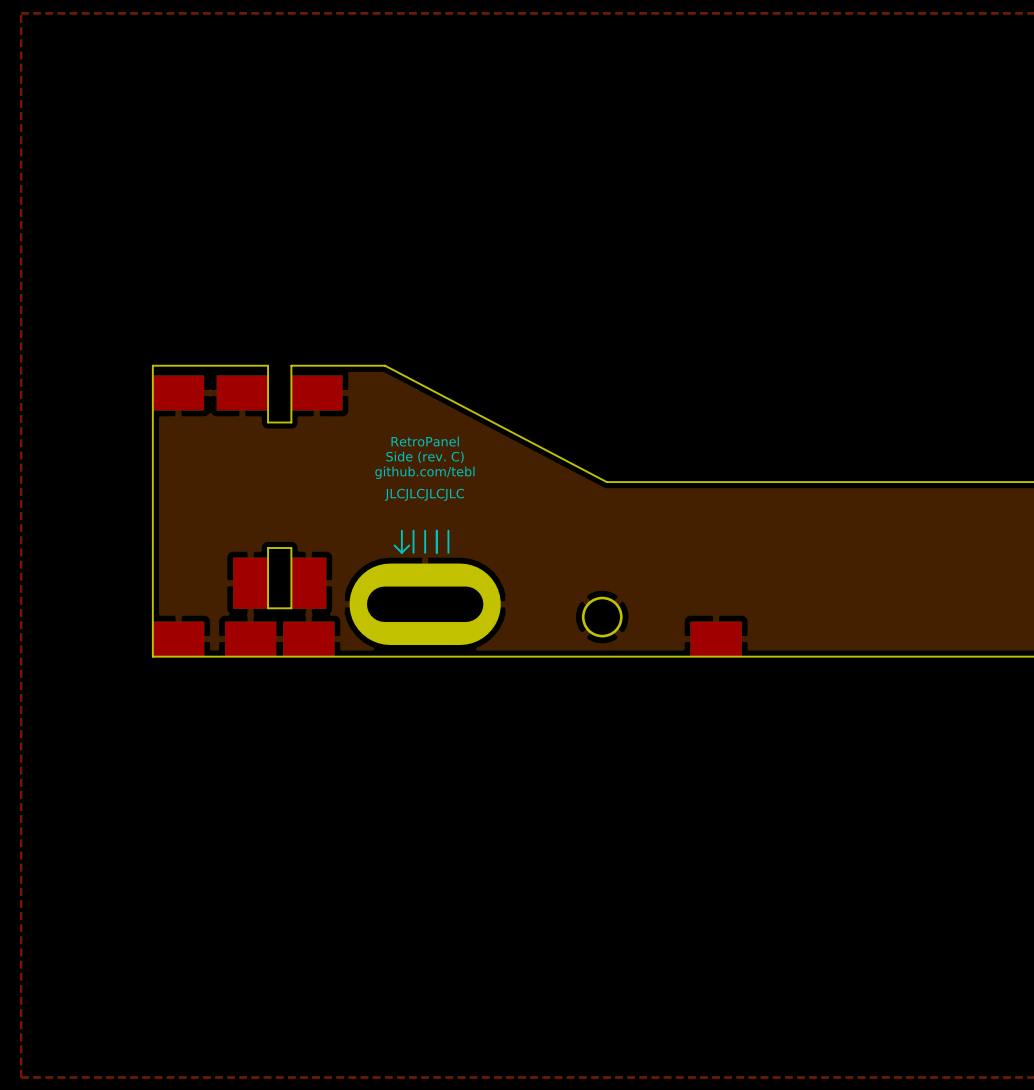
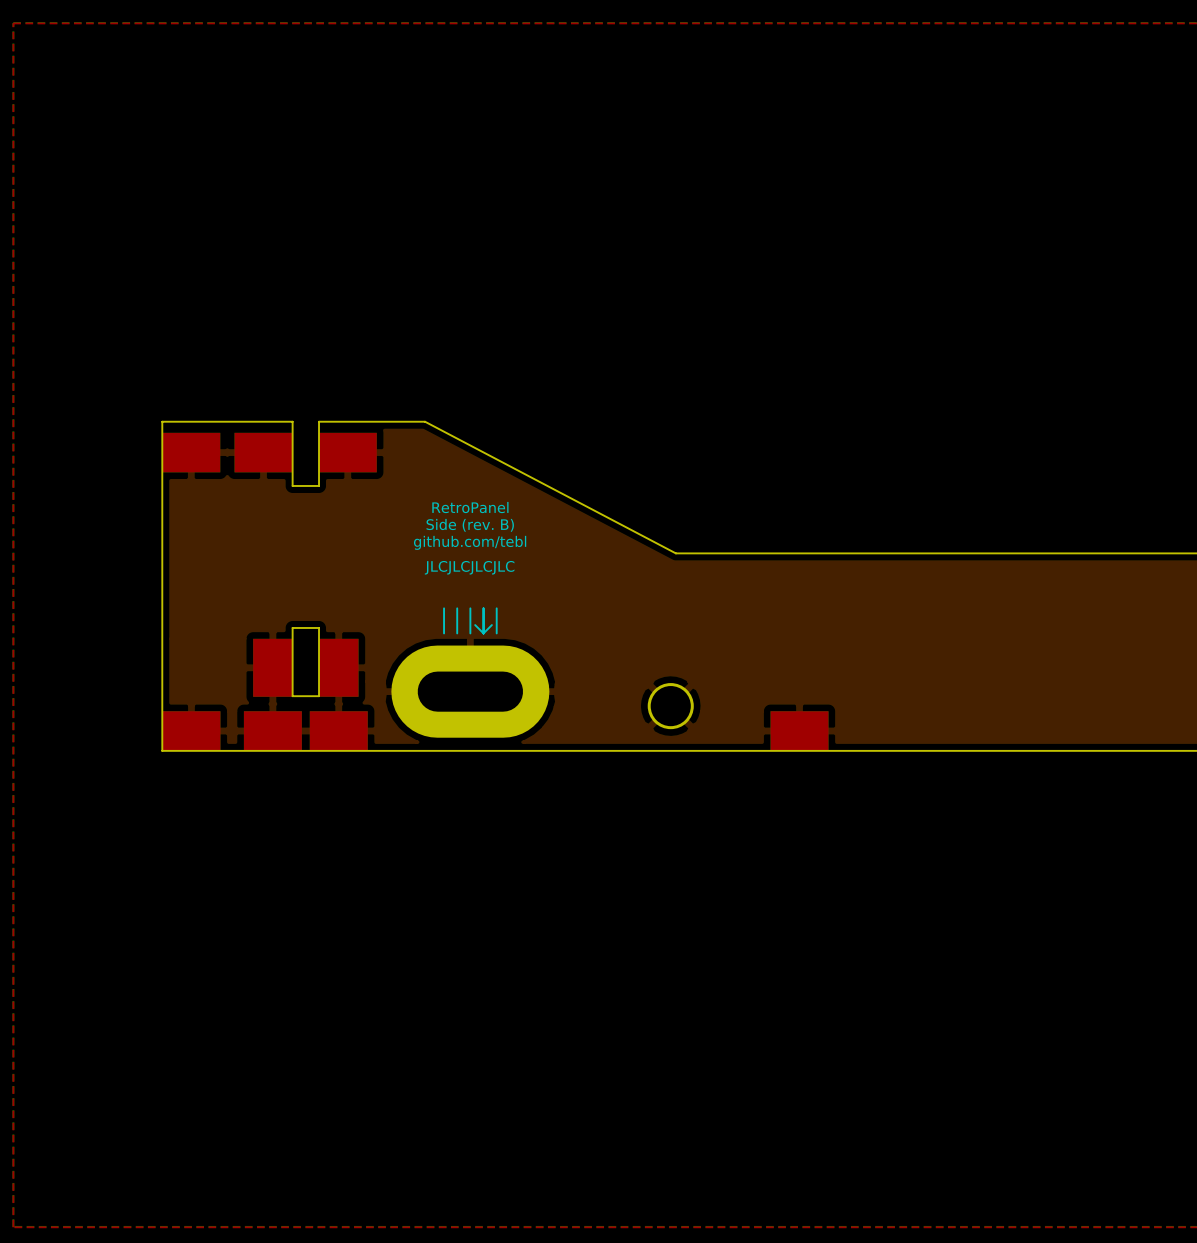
text: Side (rev. C) (425, 457) -> Side (rev. B) (470, 525)
line: (394, 545) (401, 552) (409, 545) -> (475, 625) (483, 633) (491, 625)
part footprint: [349, 563, 501, 646] -> [391, 645, 550, 738]

